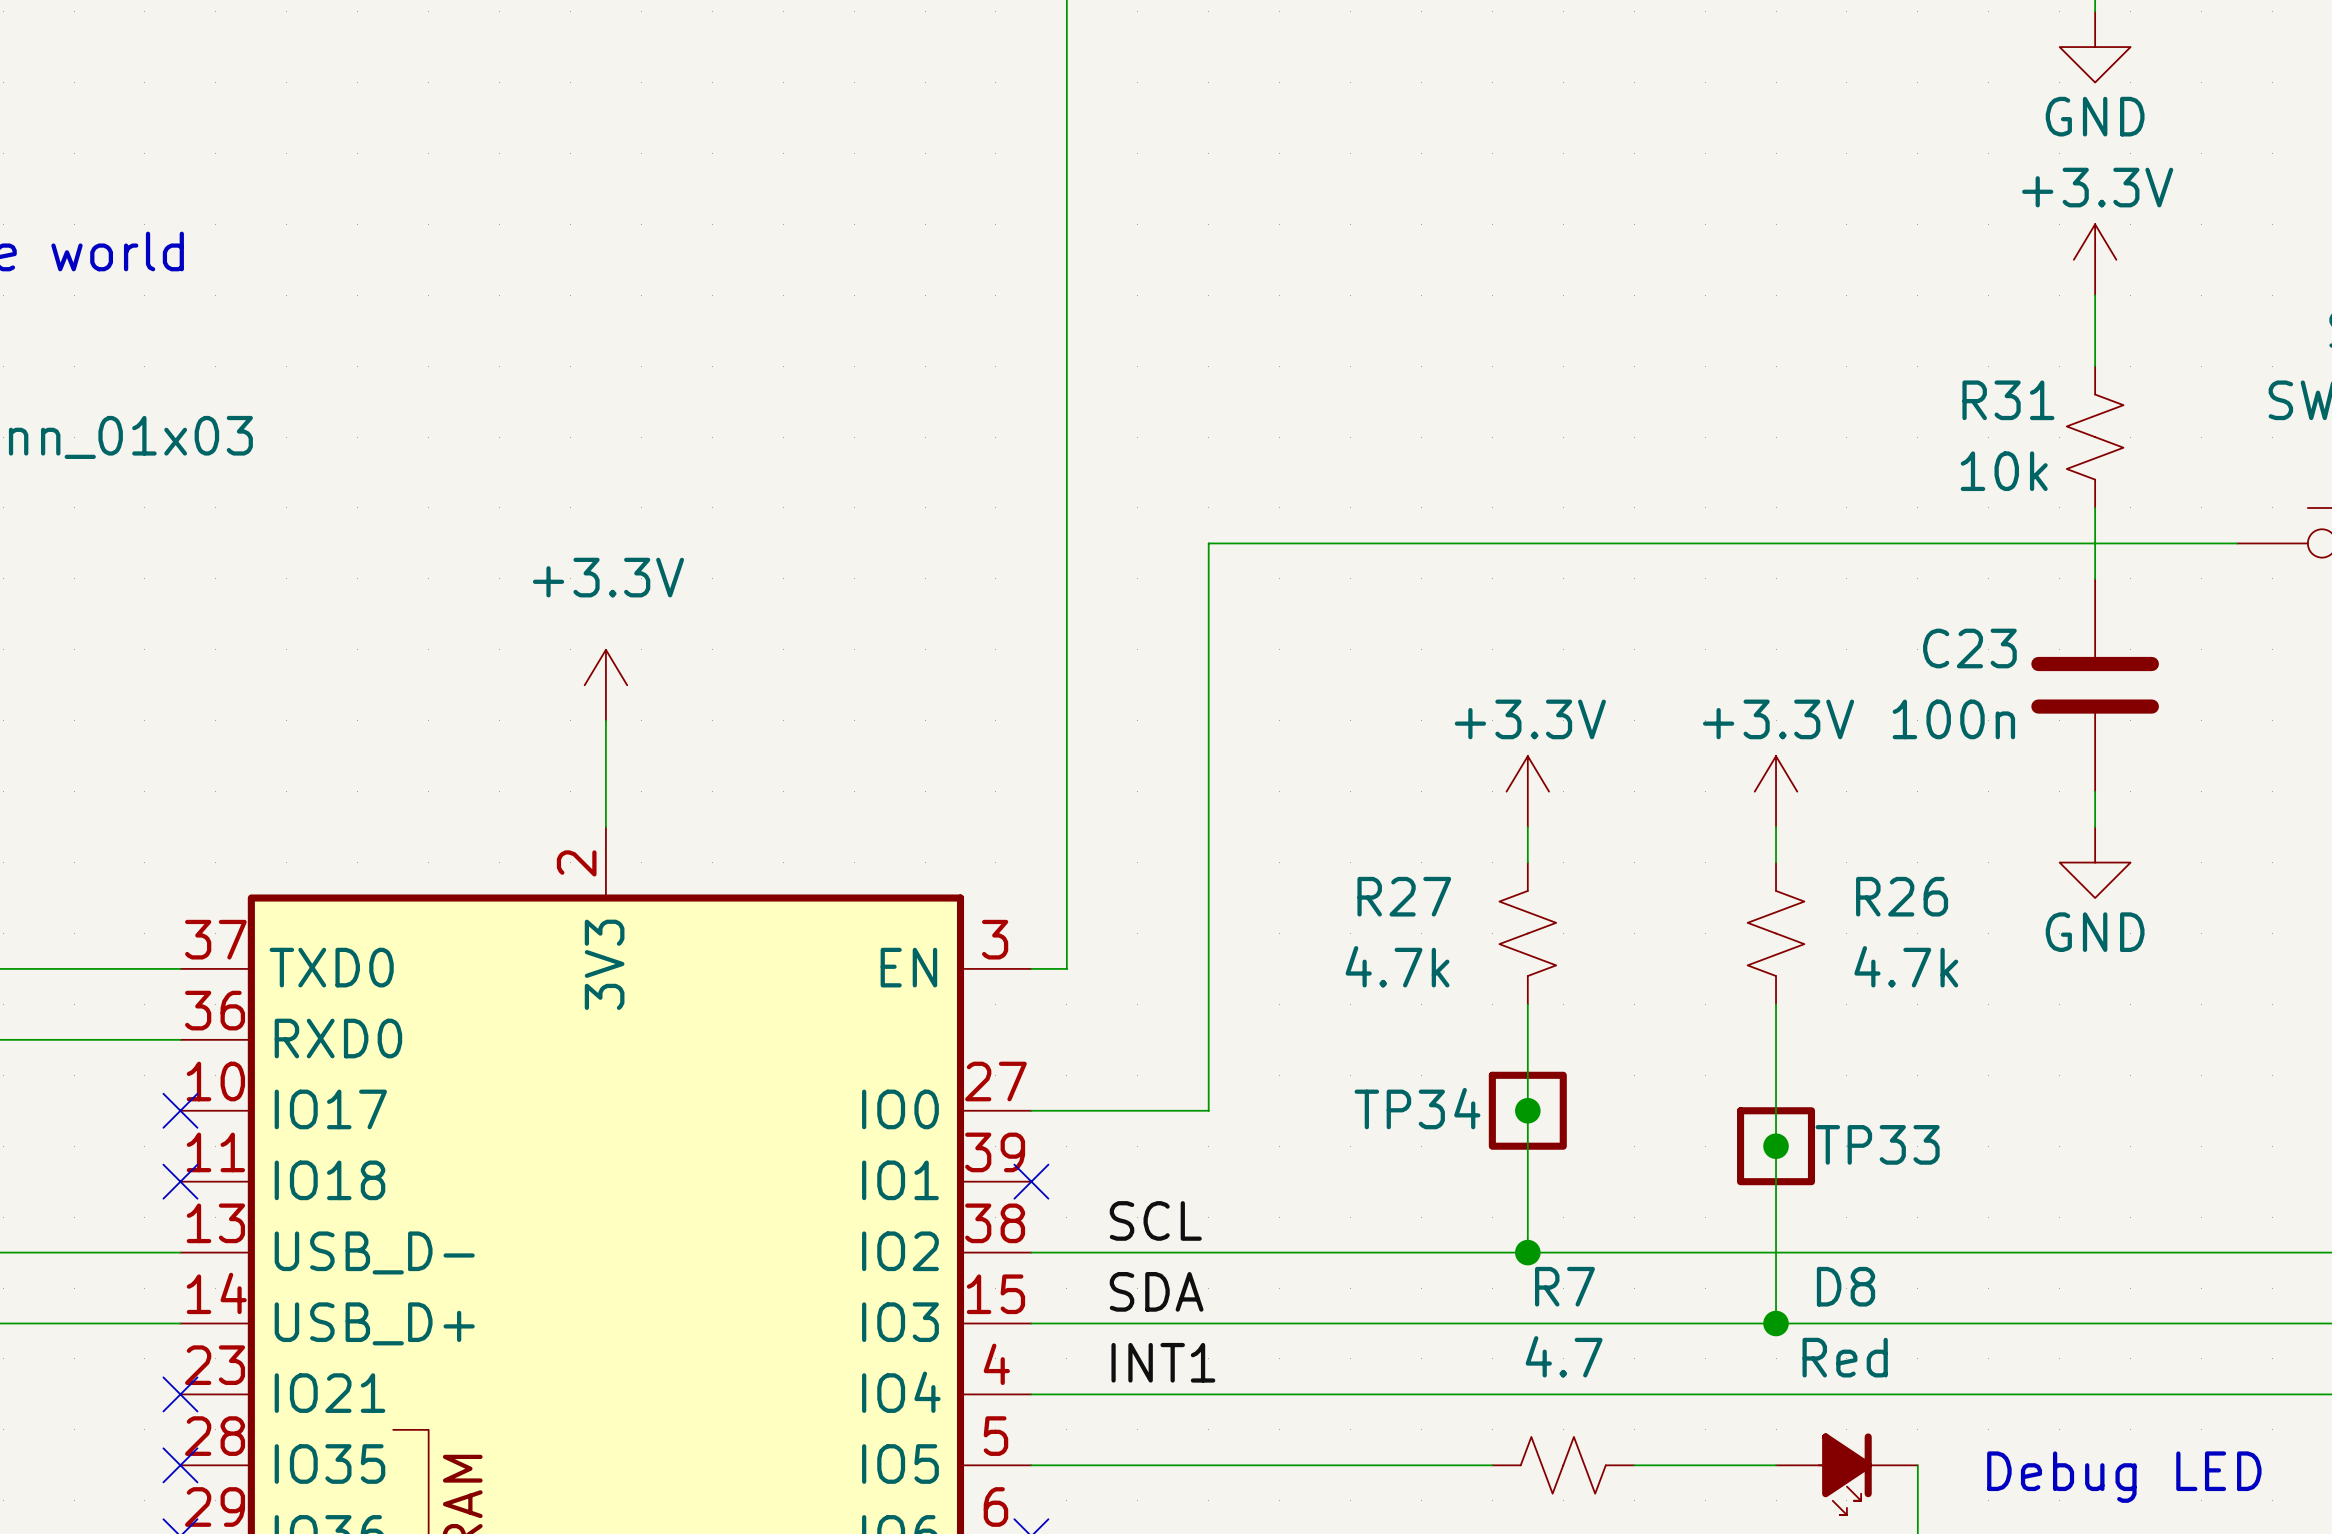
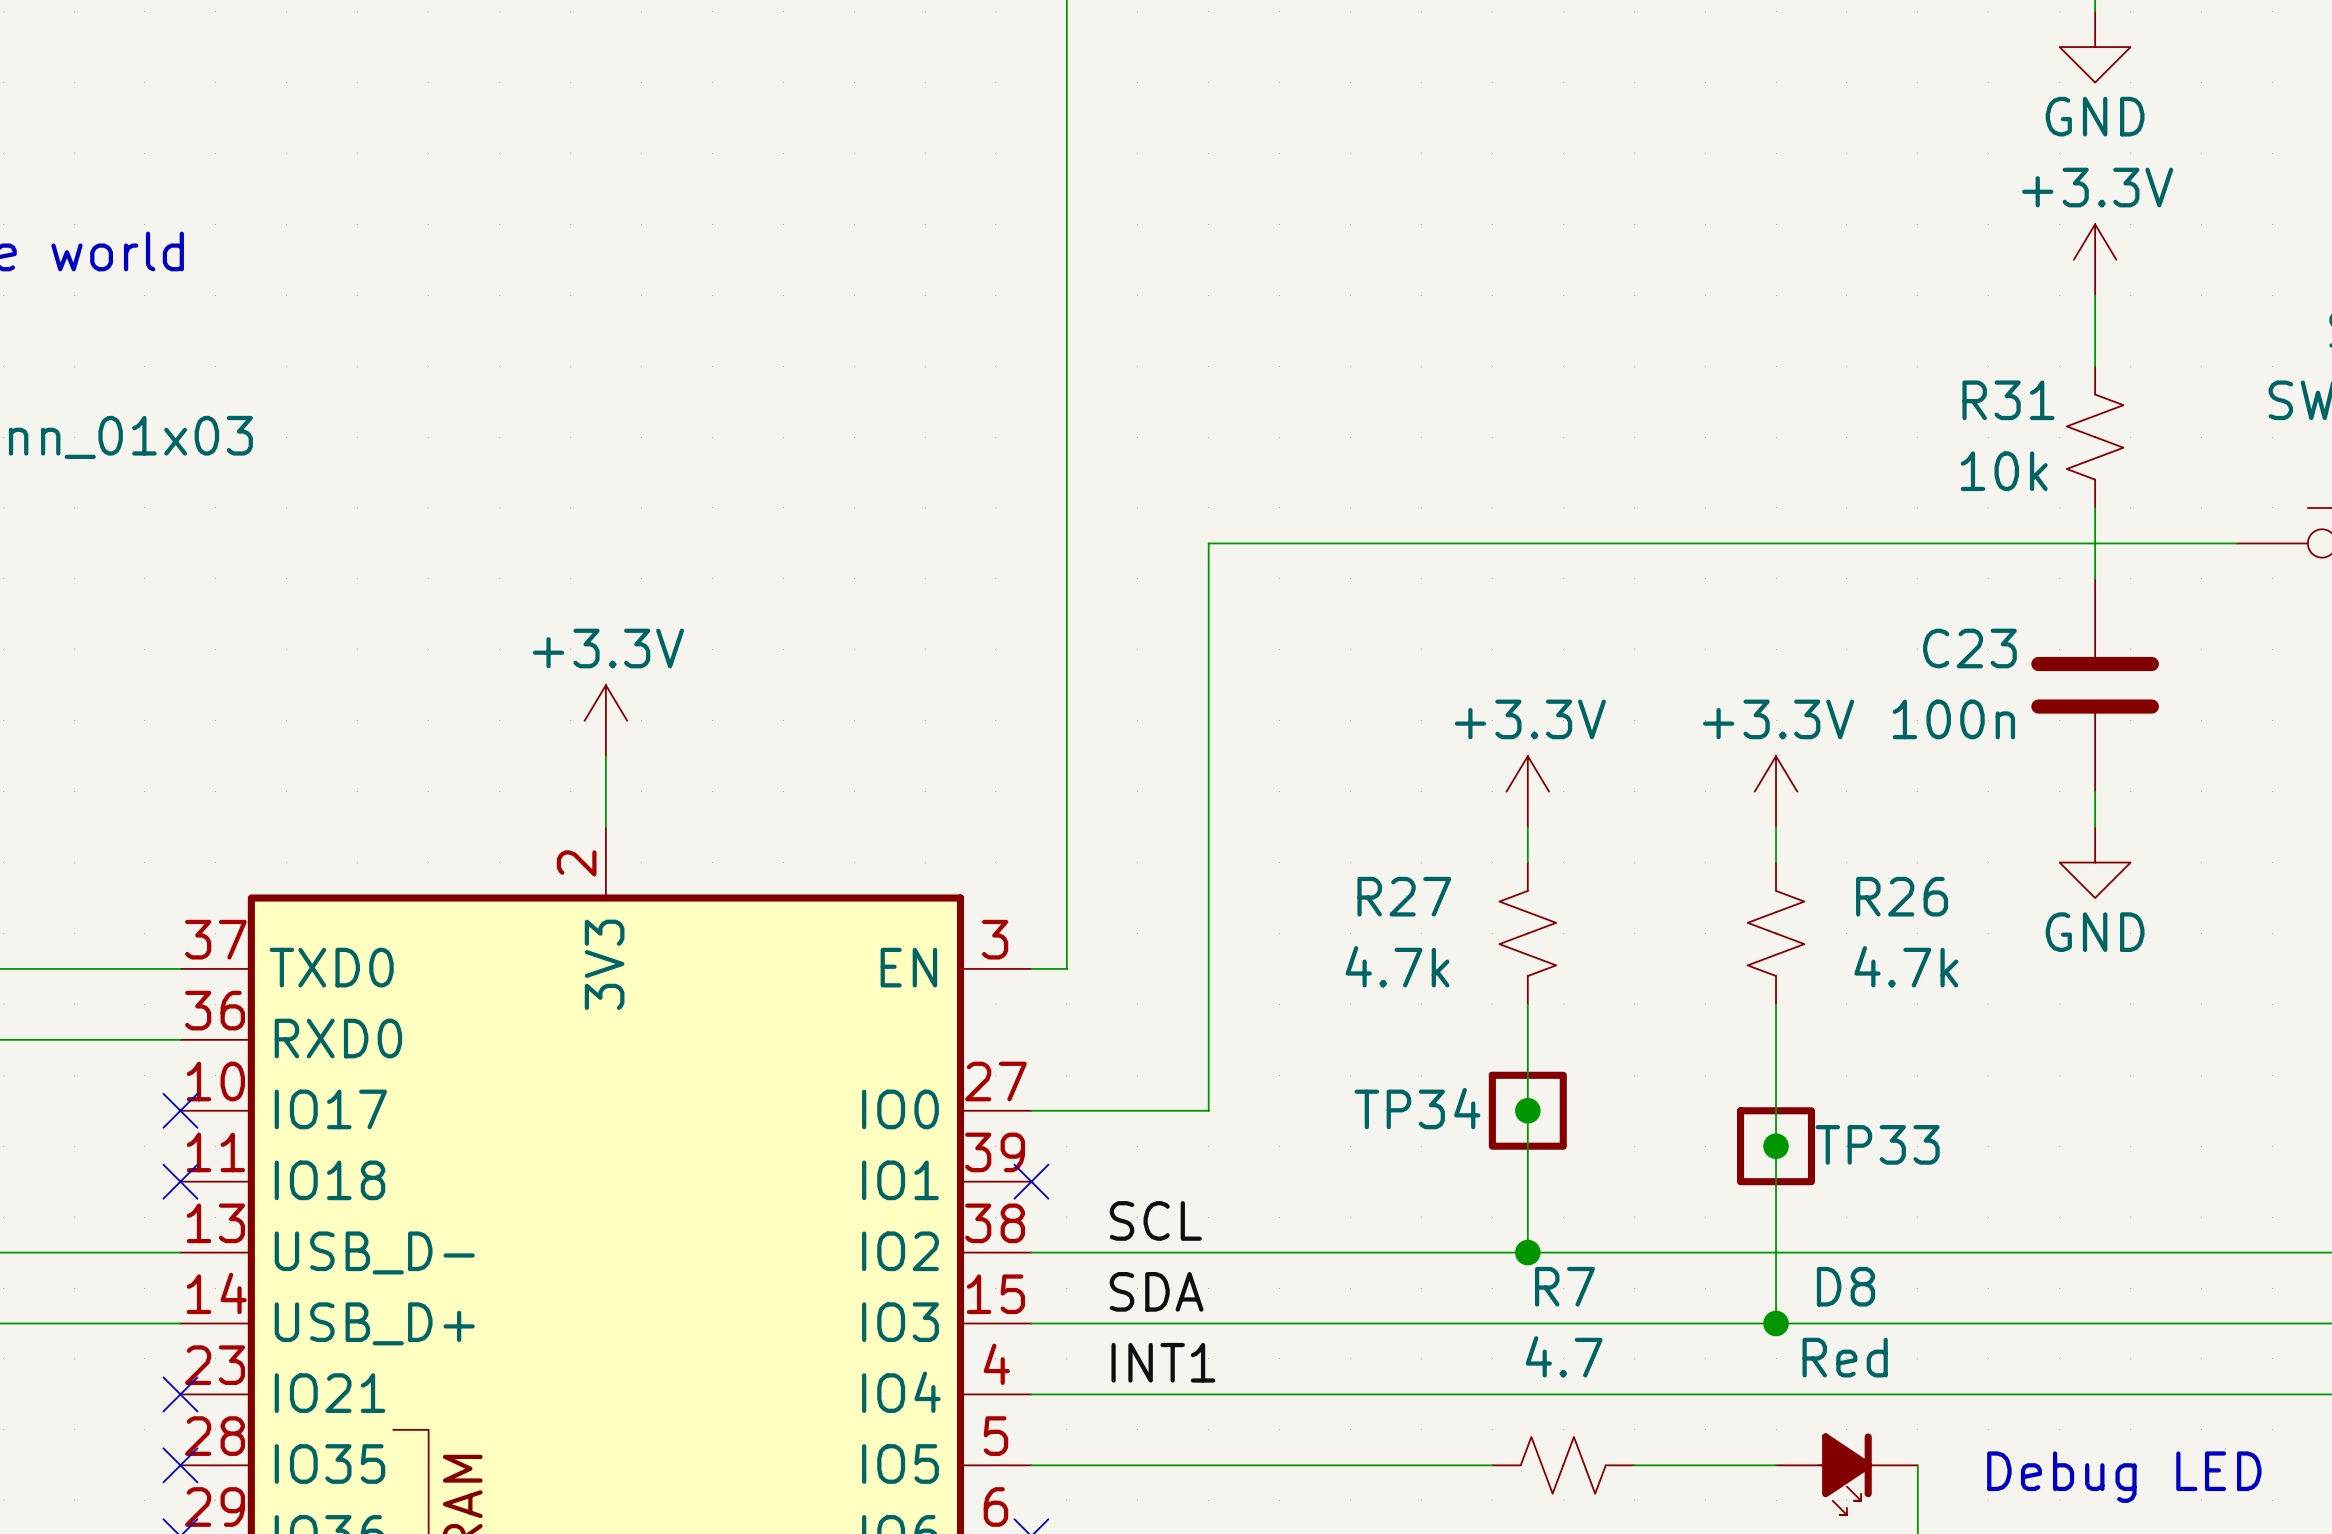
power symbol text position: +3.3V (608, 577) -> +3.3V (608, 648)
power symbol position: +3.3V (605, 685) -> +3.3V (605, 720)

